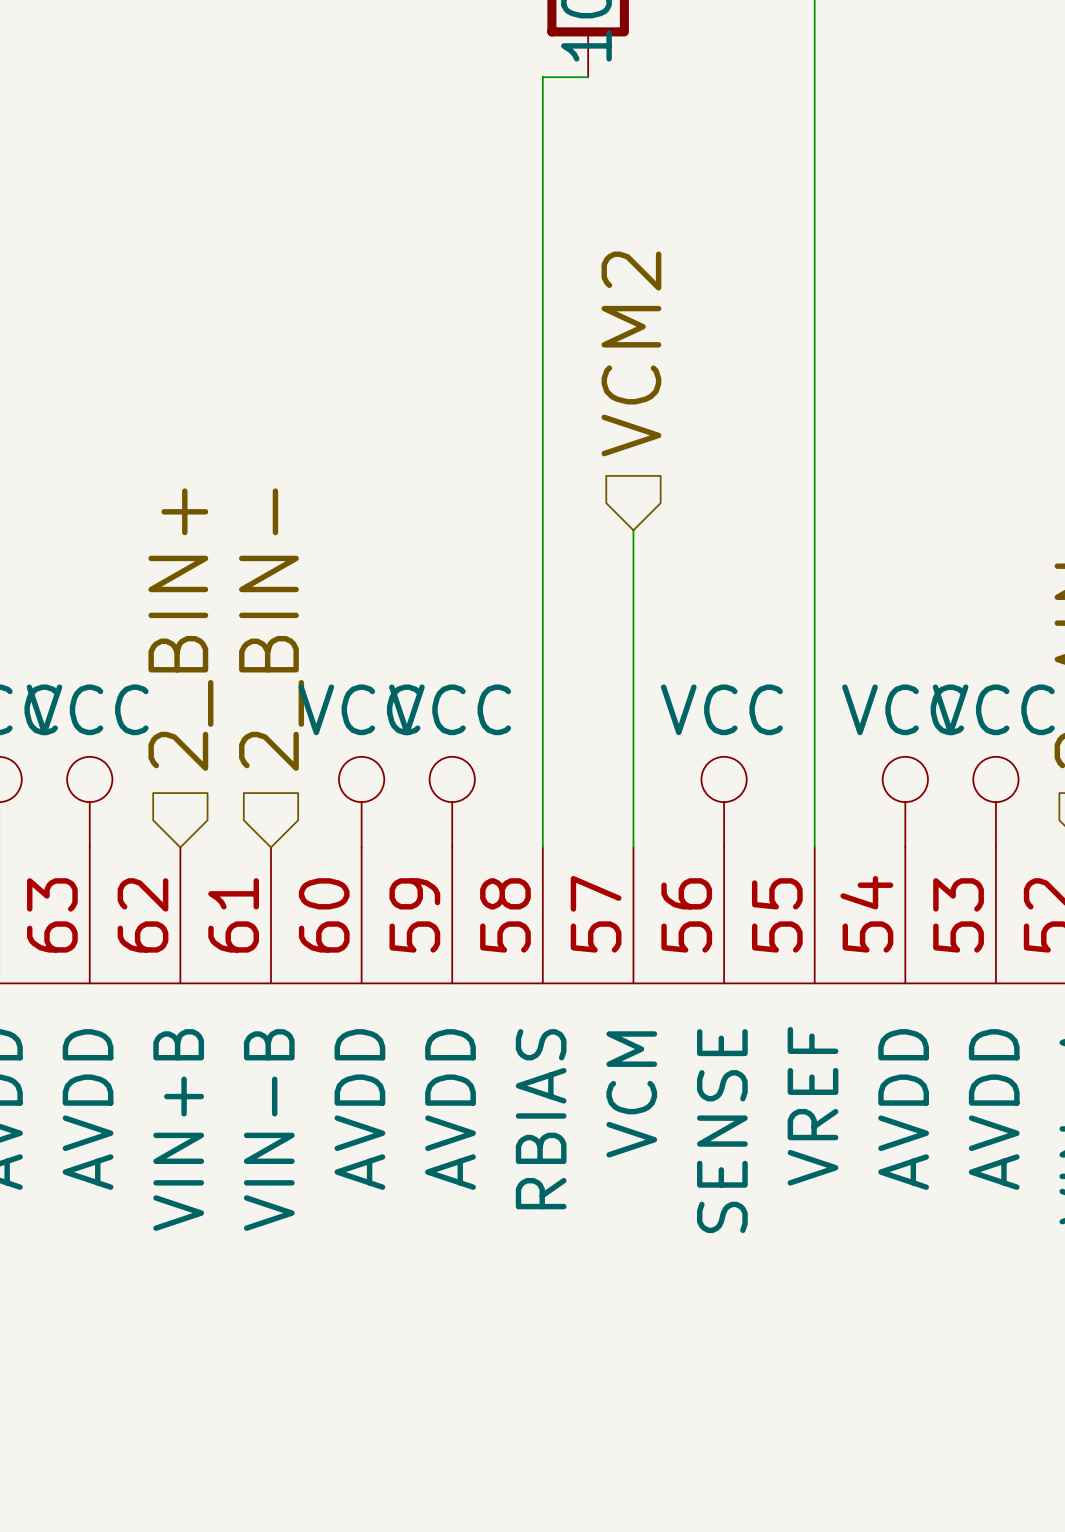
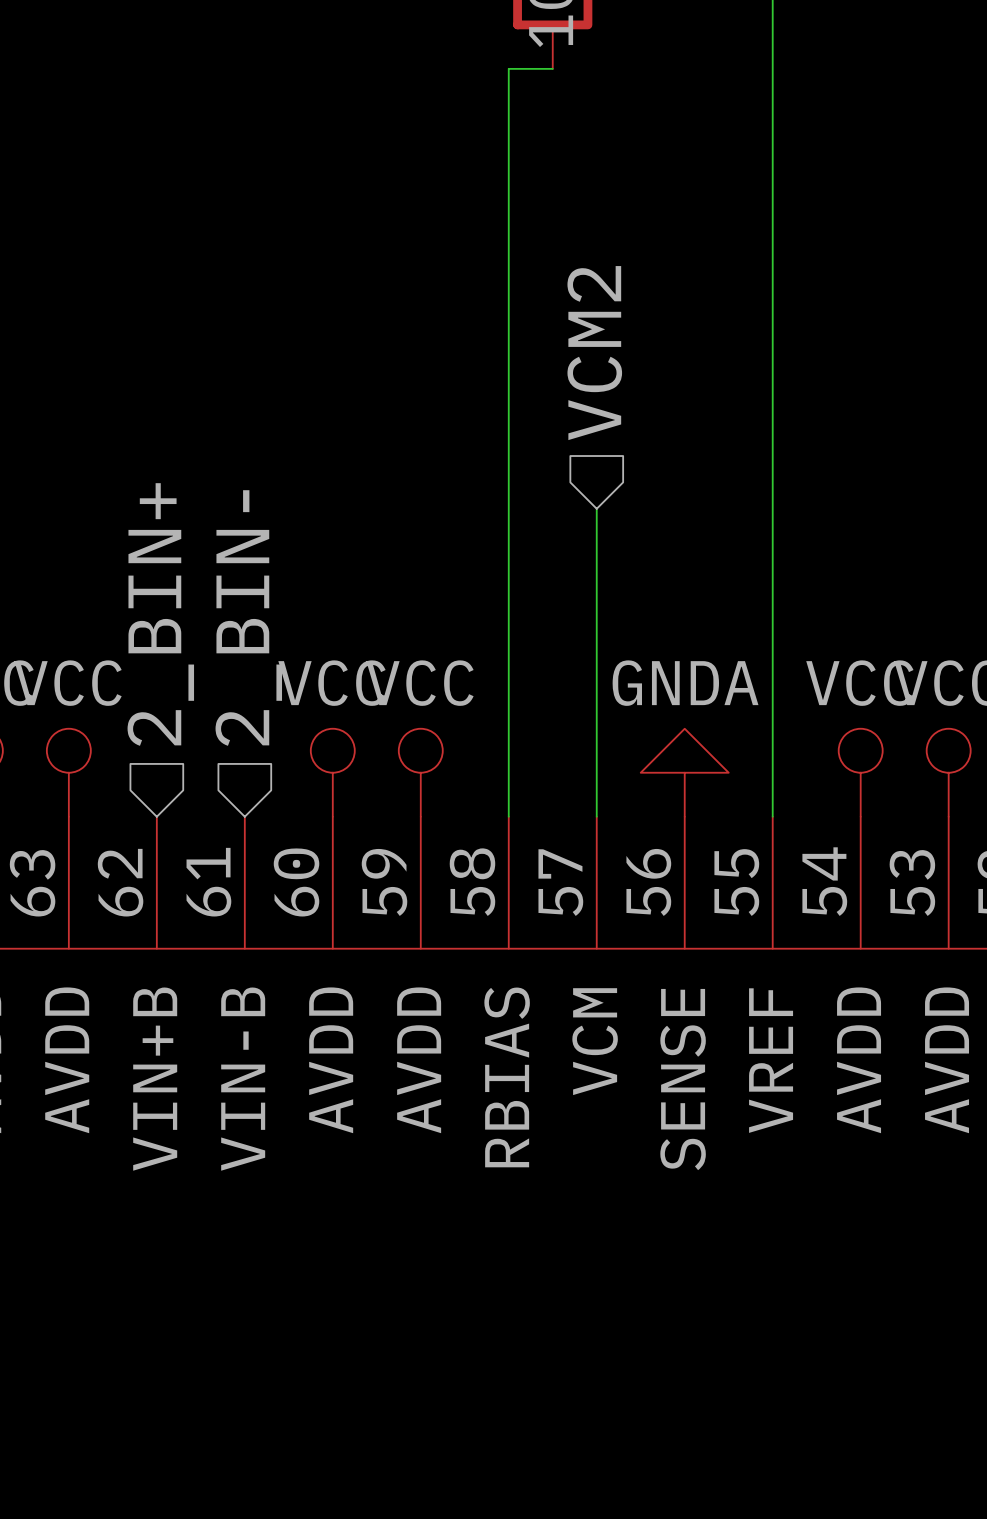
power symbol: VCC (724, 802) -> GNDA (684, 772)

